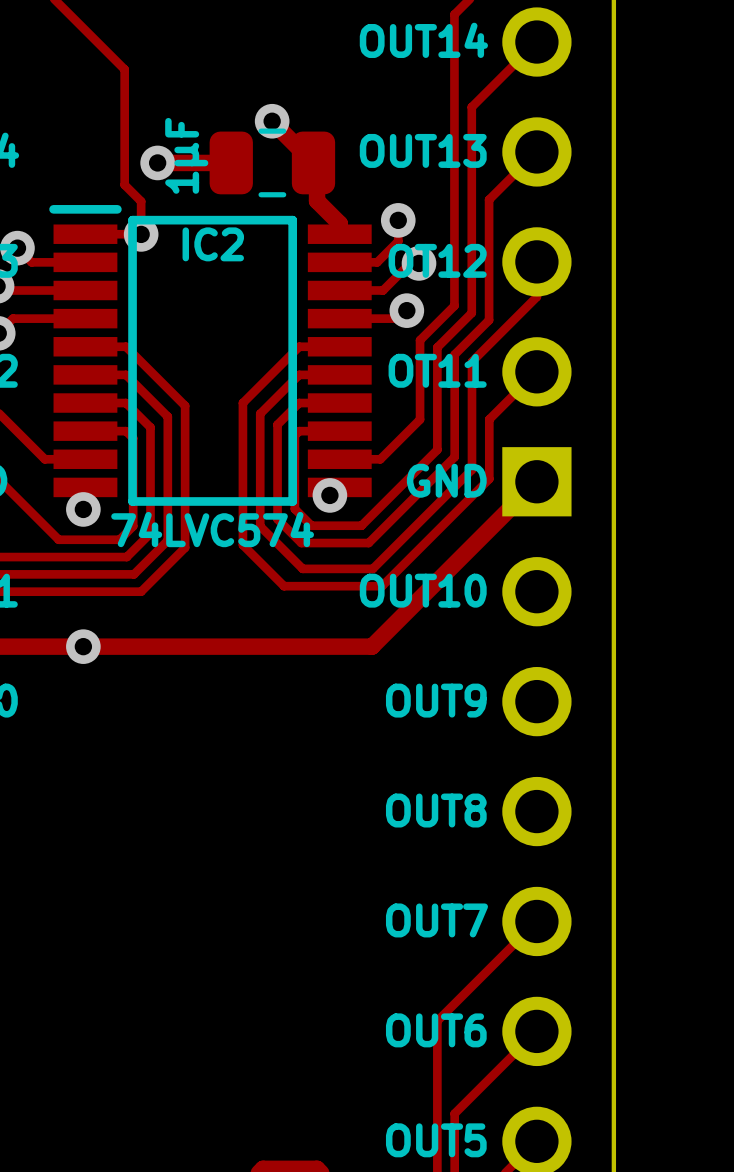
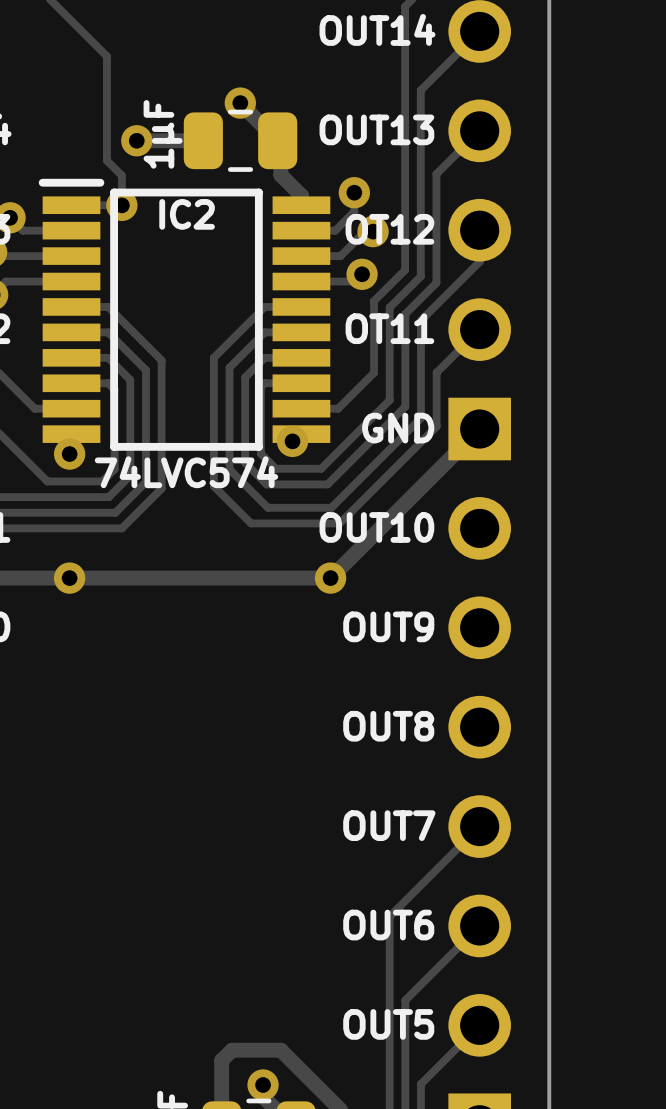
via: none -> (330, 578)

